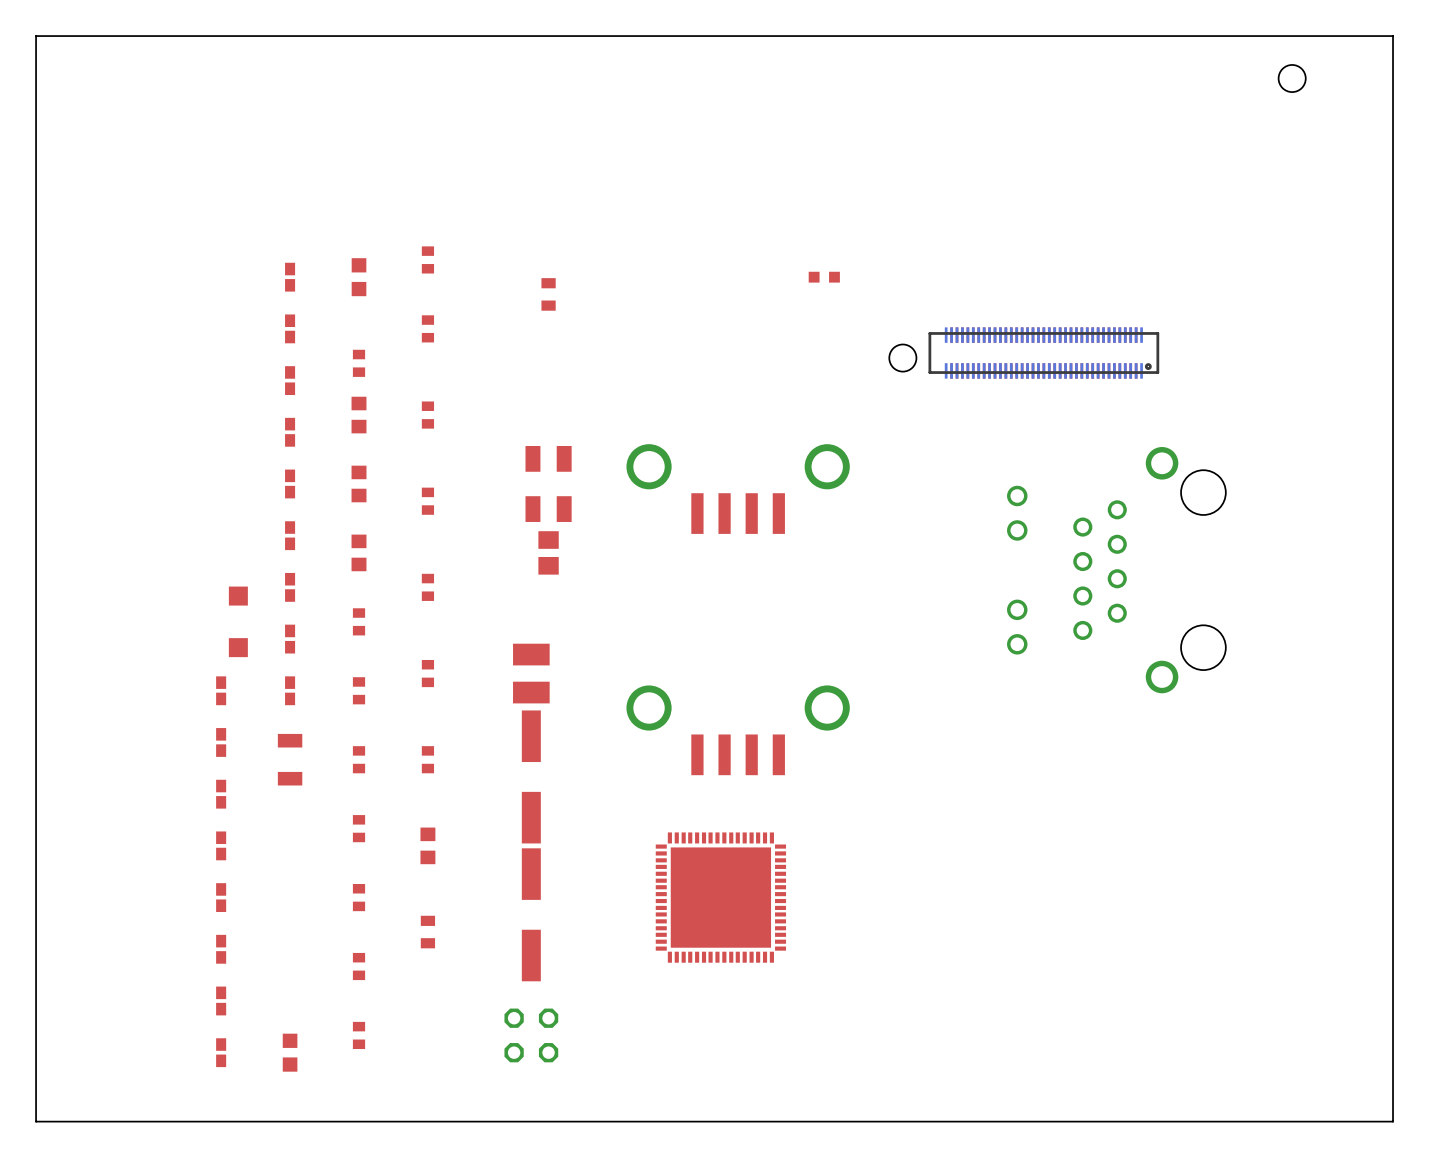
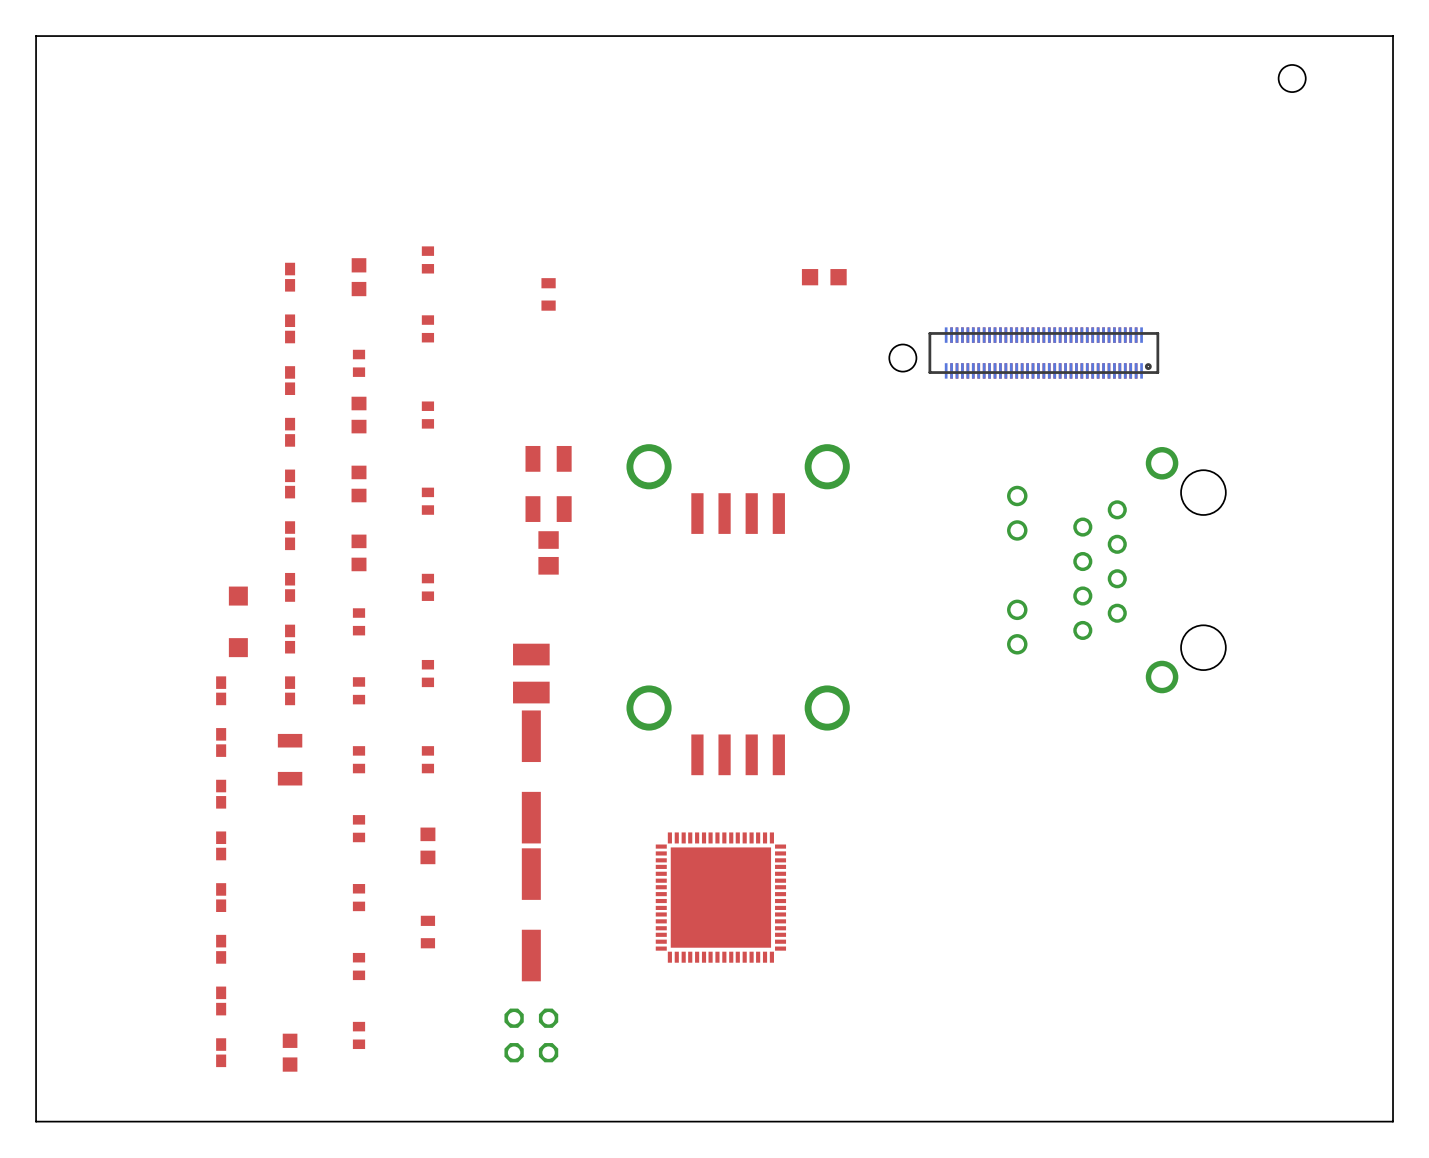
part footprint: [808, 271, 840, 283] -> [801, 269, 847, 286]

